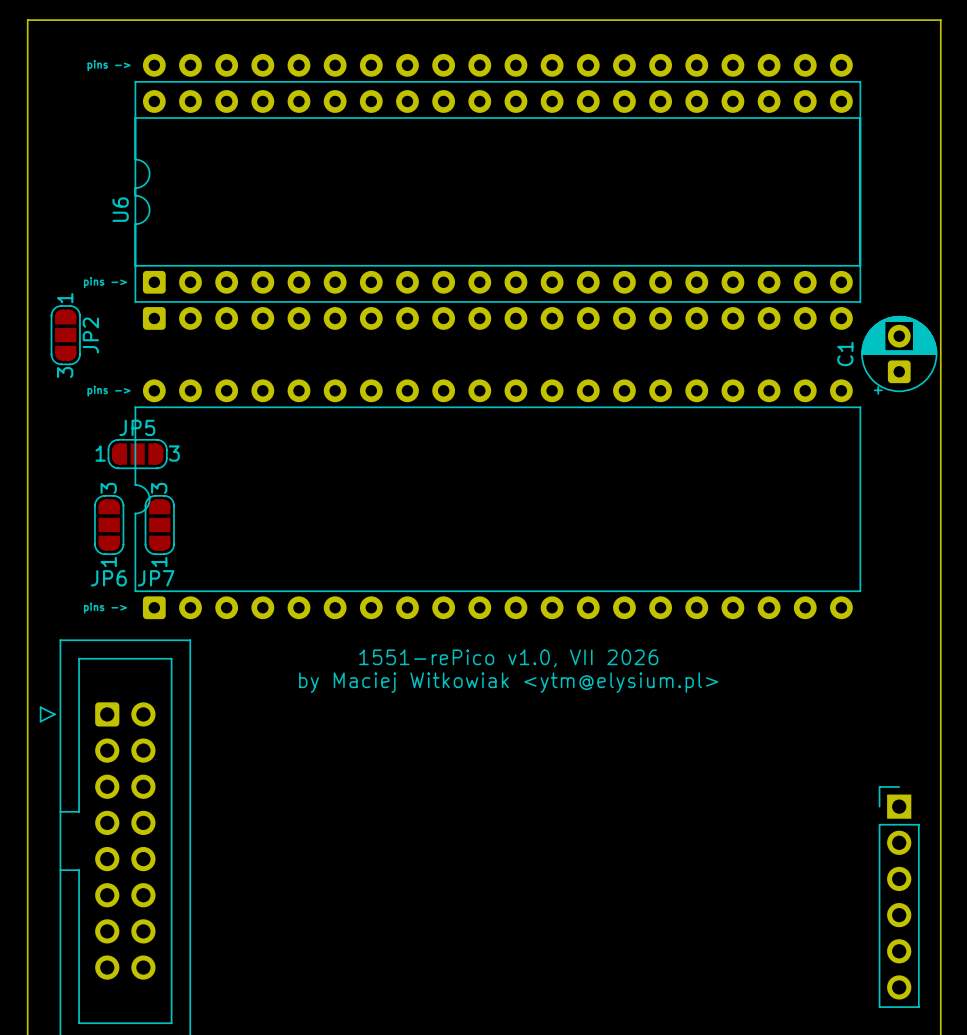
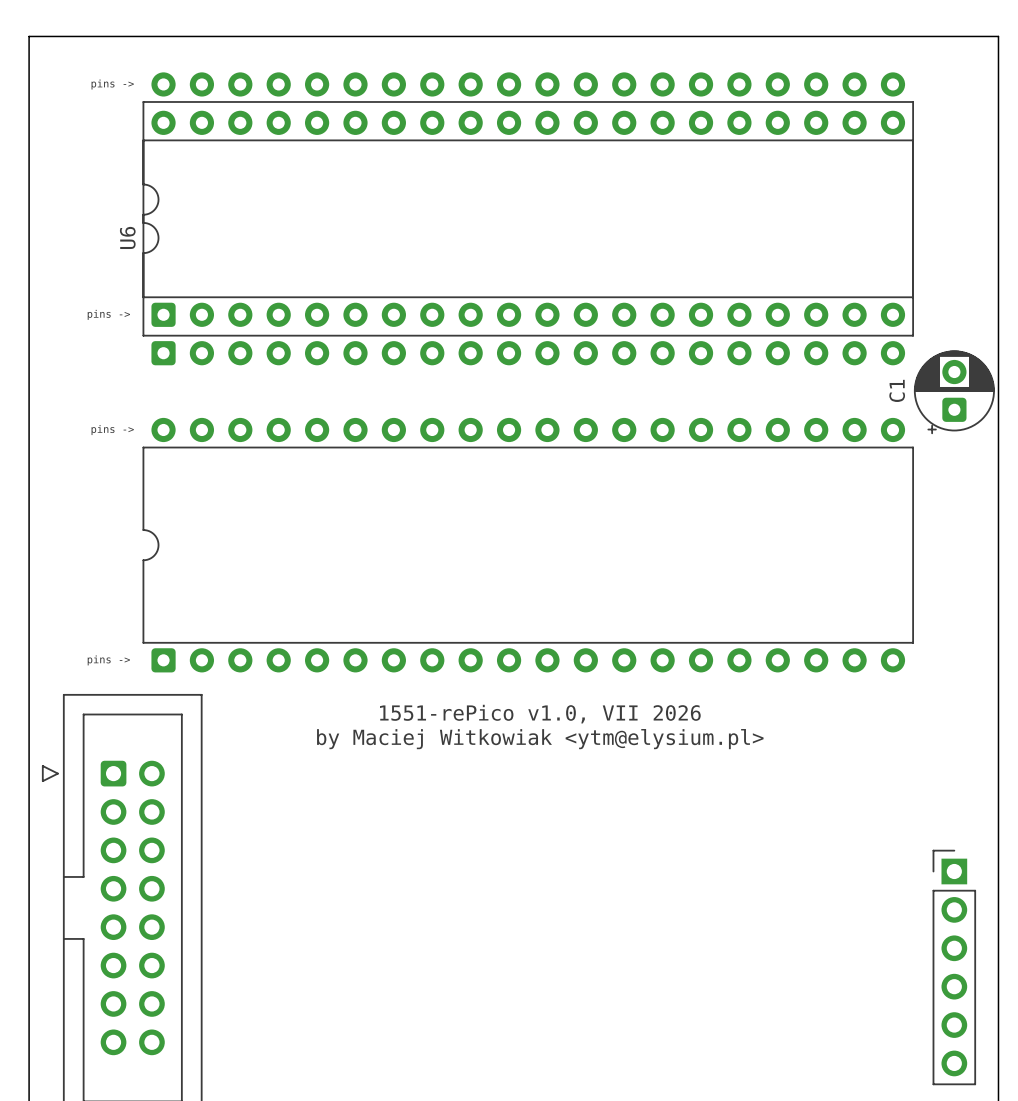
JP2: (65, 335) -> none
JP5: (137, 454) -> none
JP6: (109, 525) -> none
JP7: (159, 525) -> none

